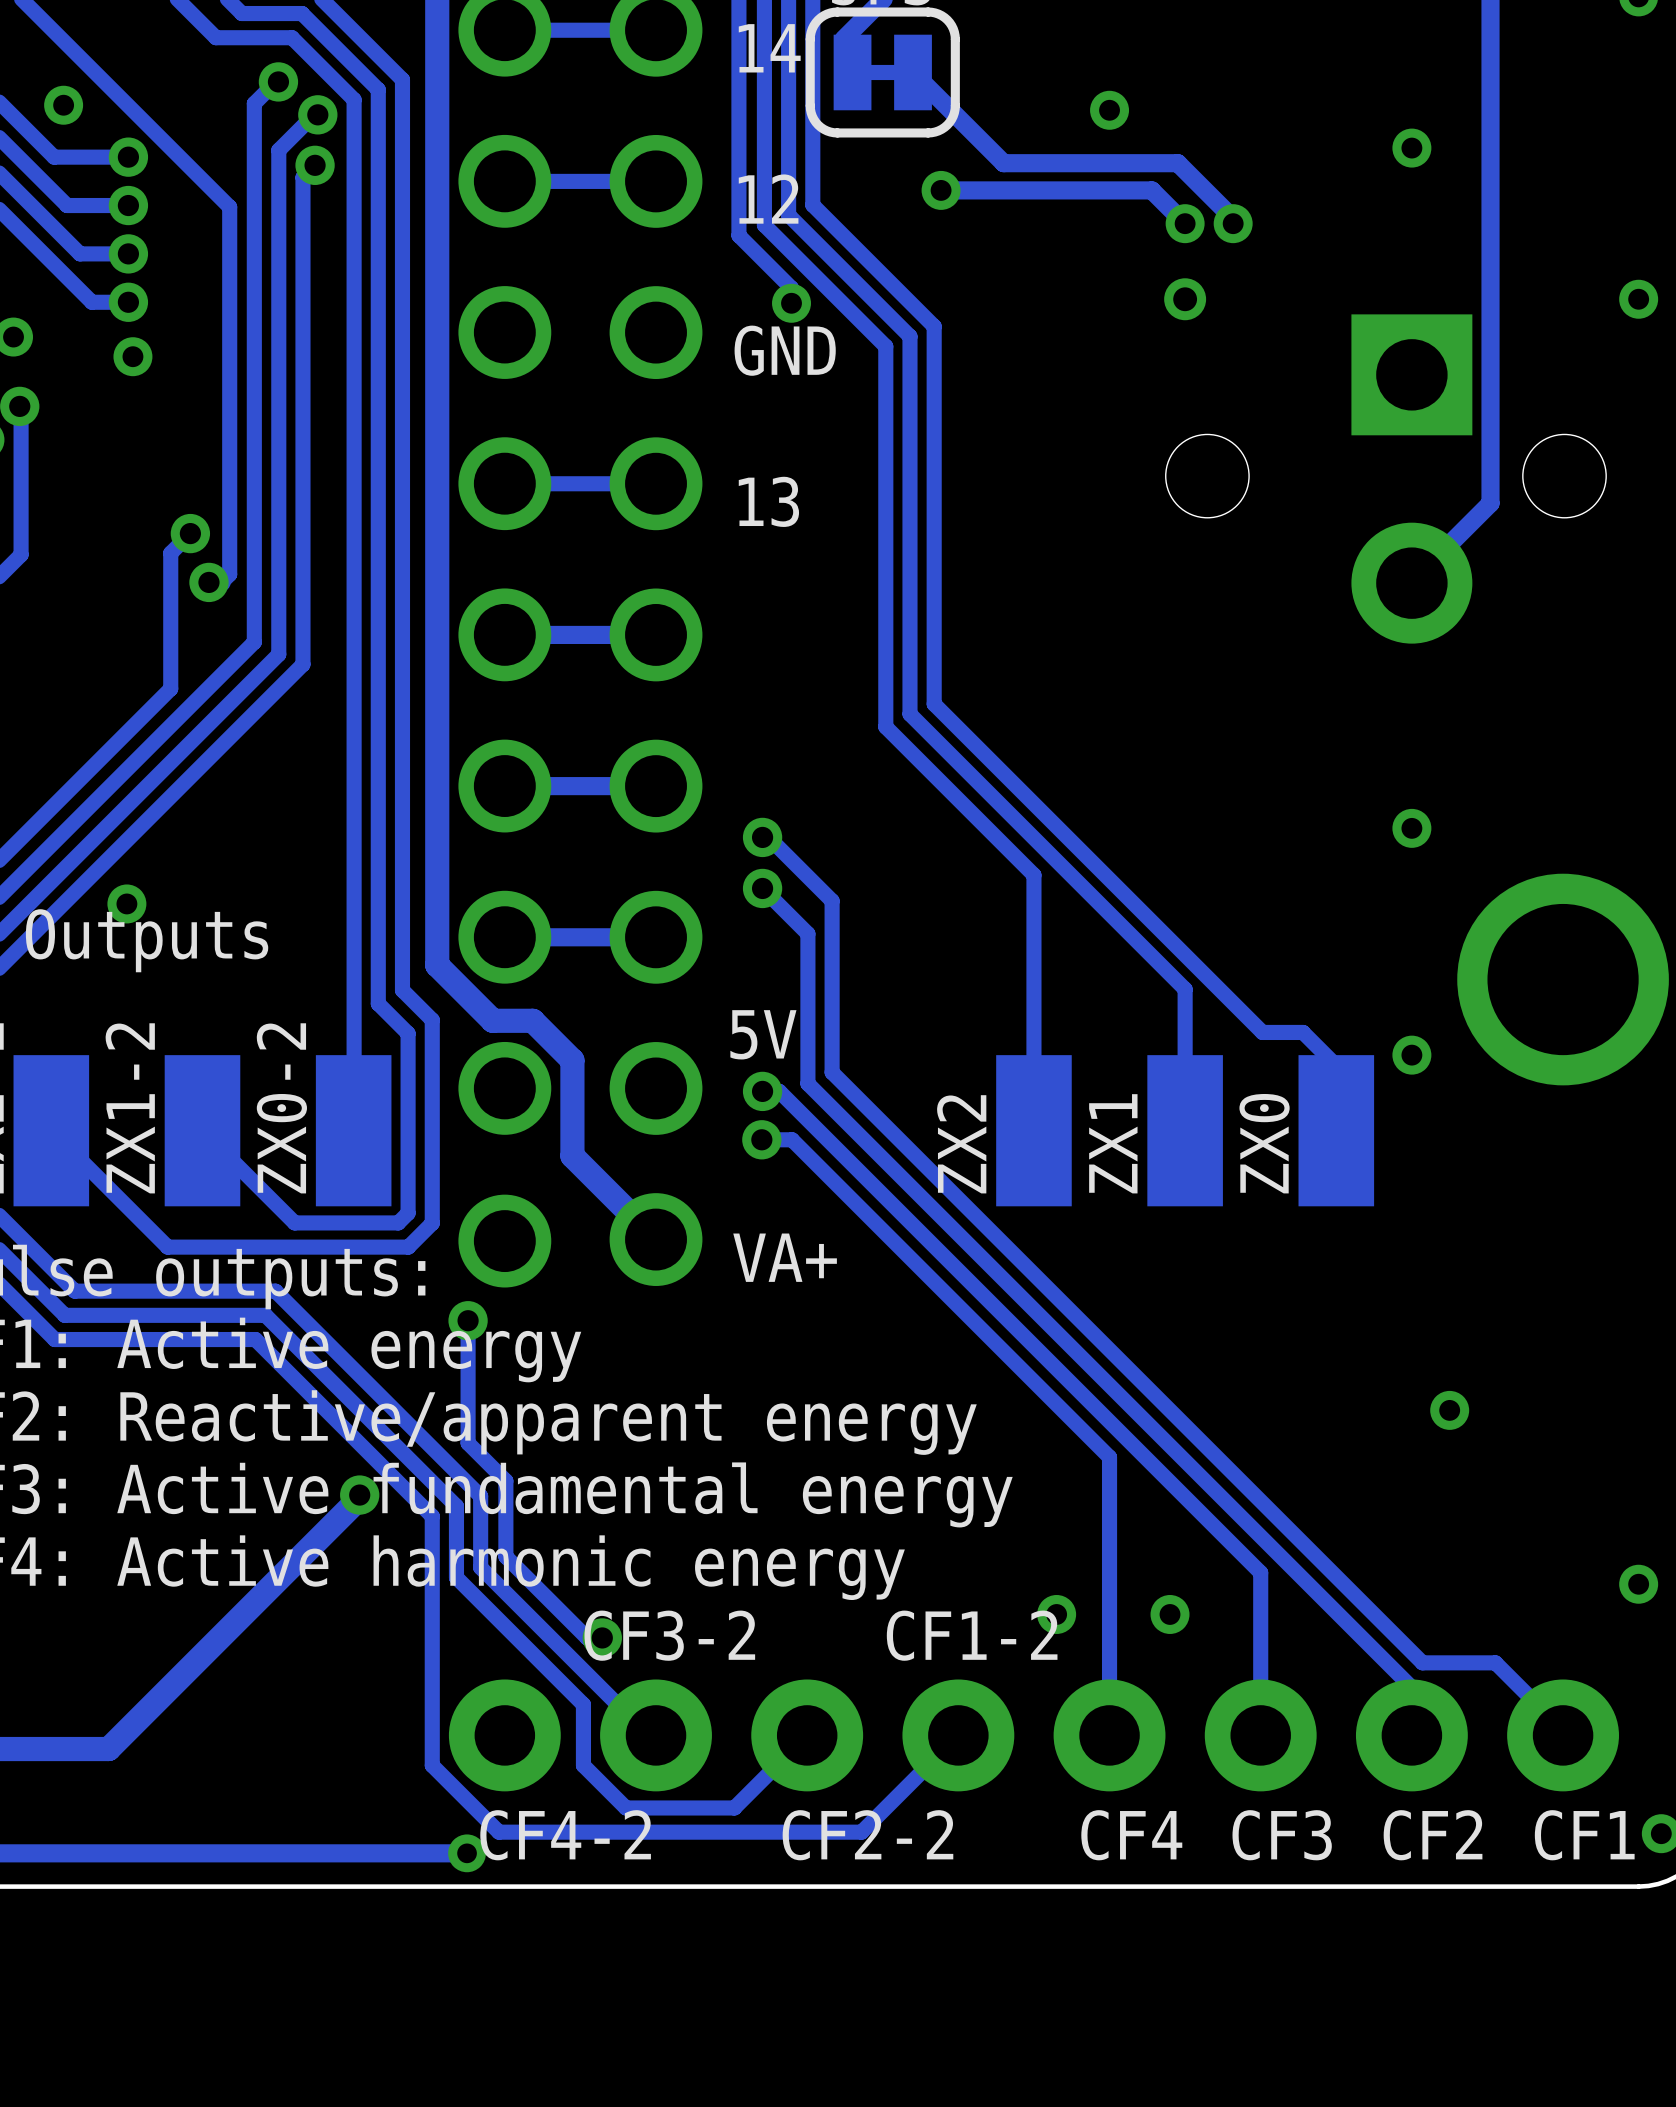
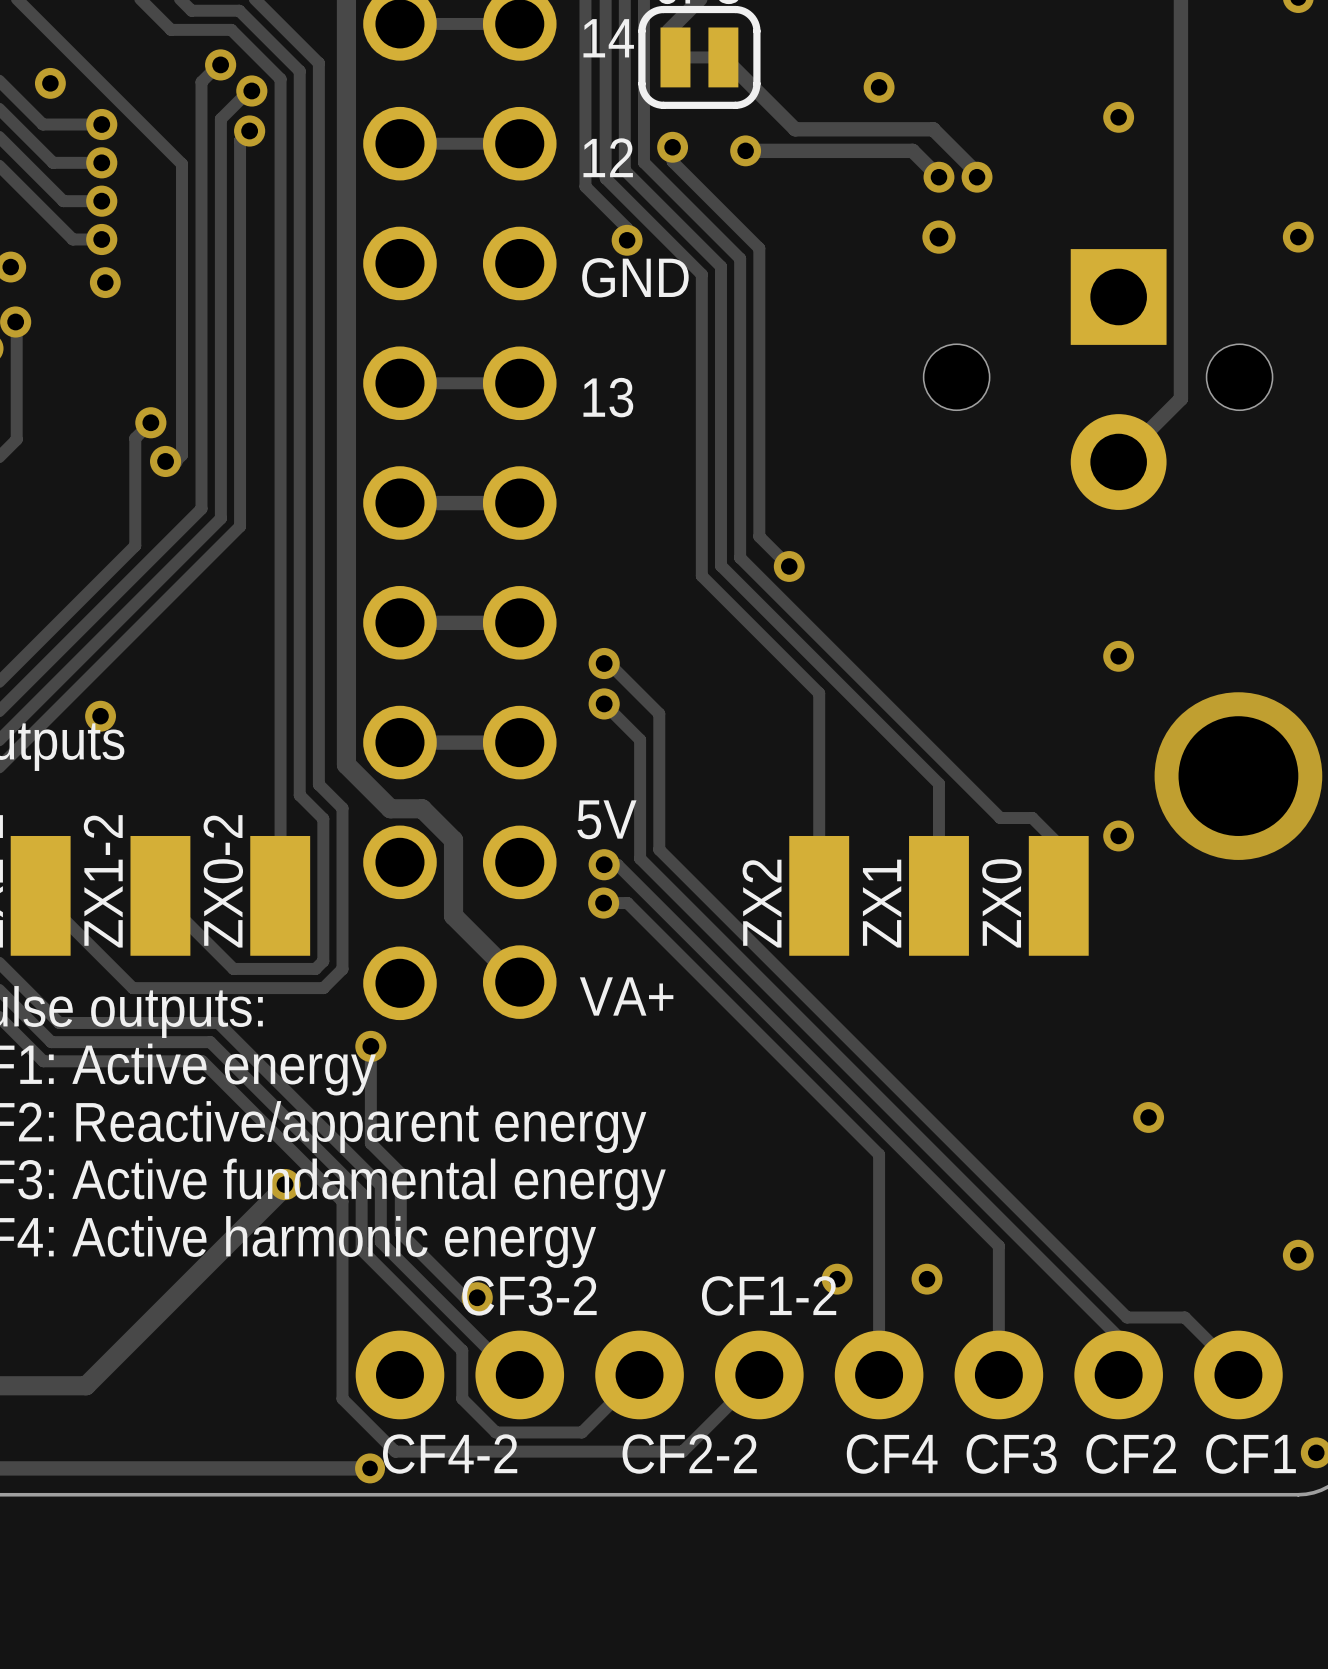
track: none -> (672, 147) (672, 161) (759, 248) (759, 536) (789, 566)
via: none -> (672, 147)
via: none -> (789, 566)

